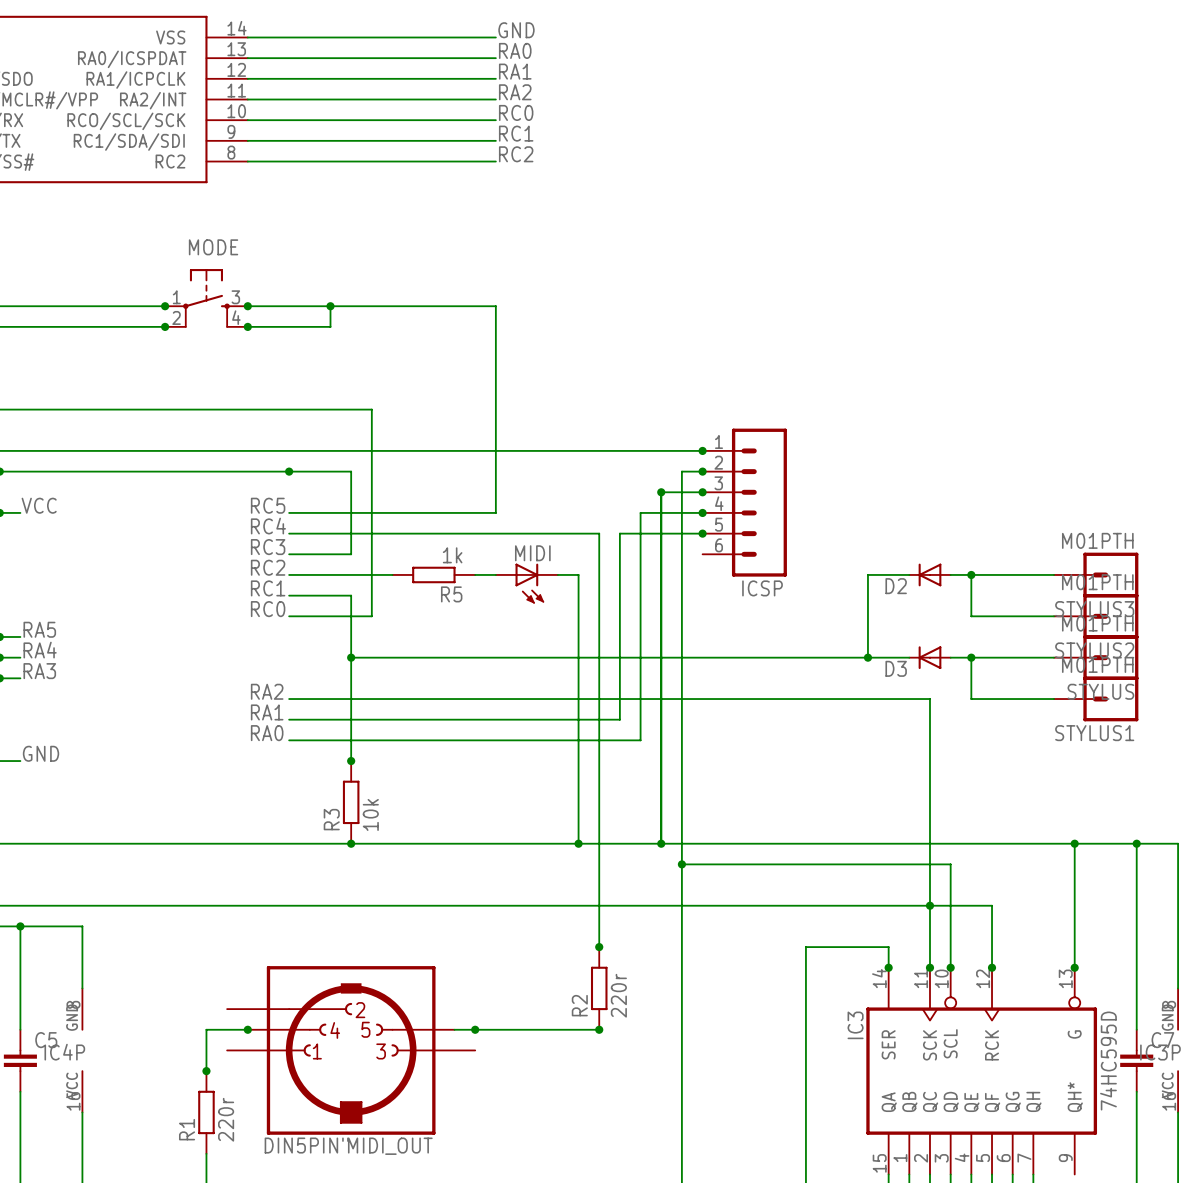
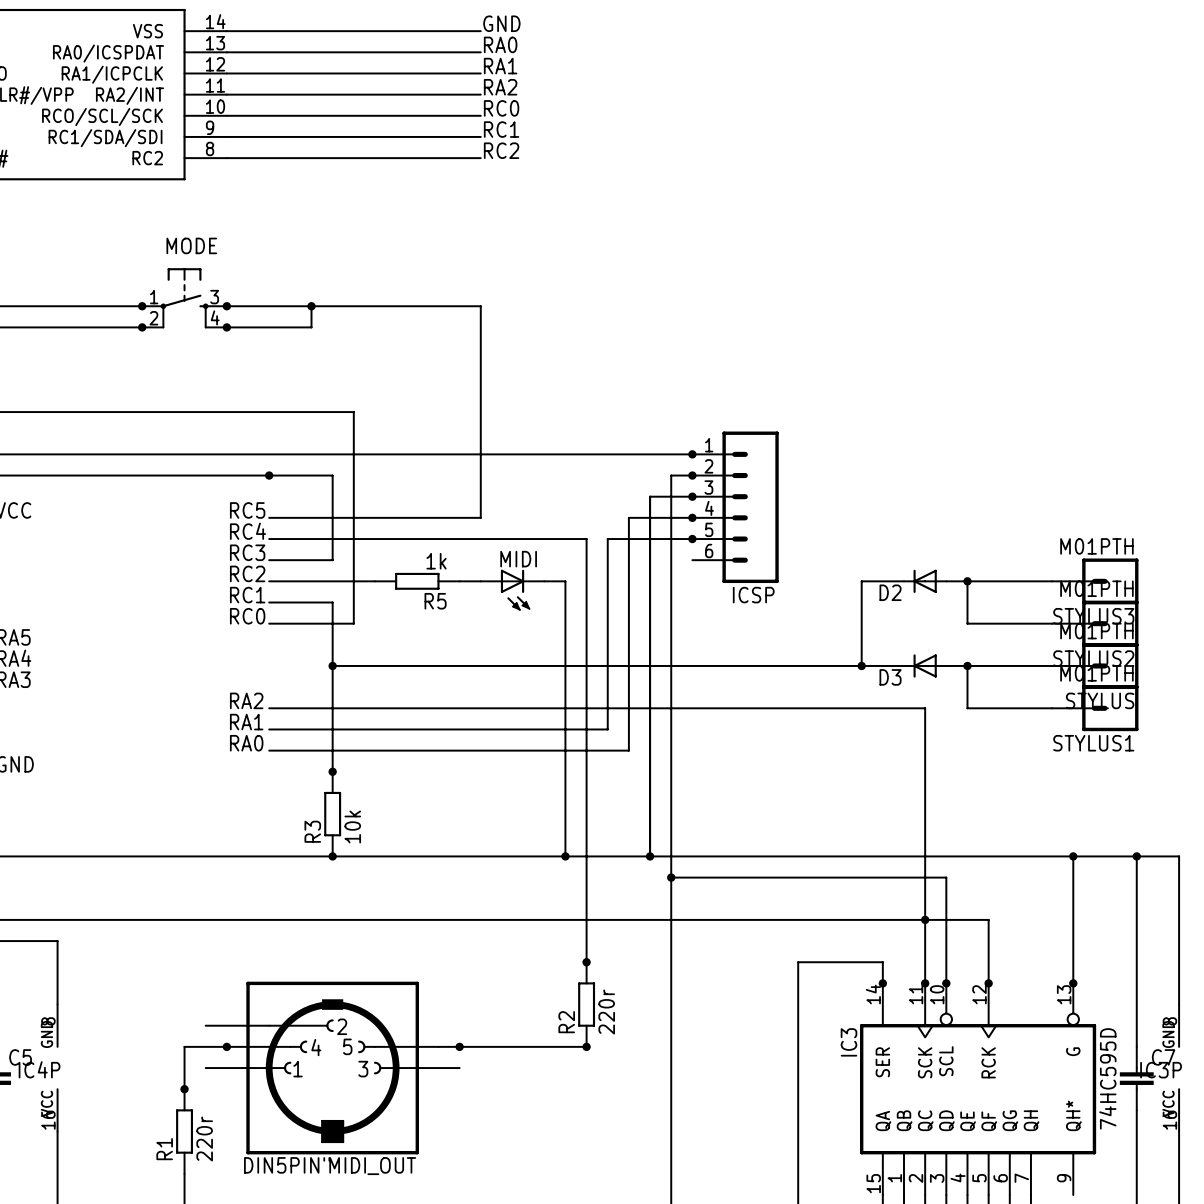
junction: (661, 492) -> none

